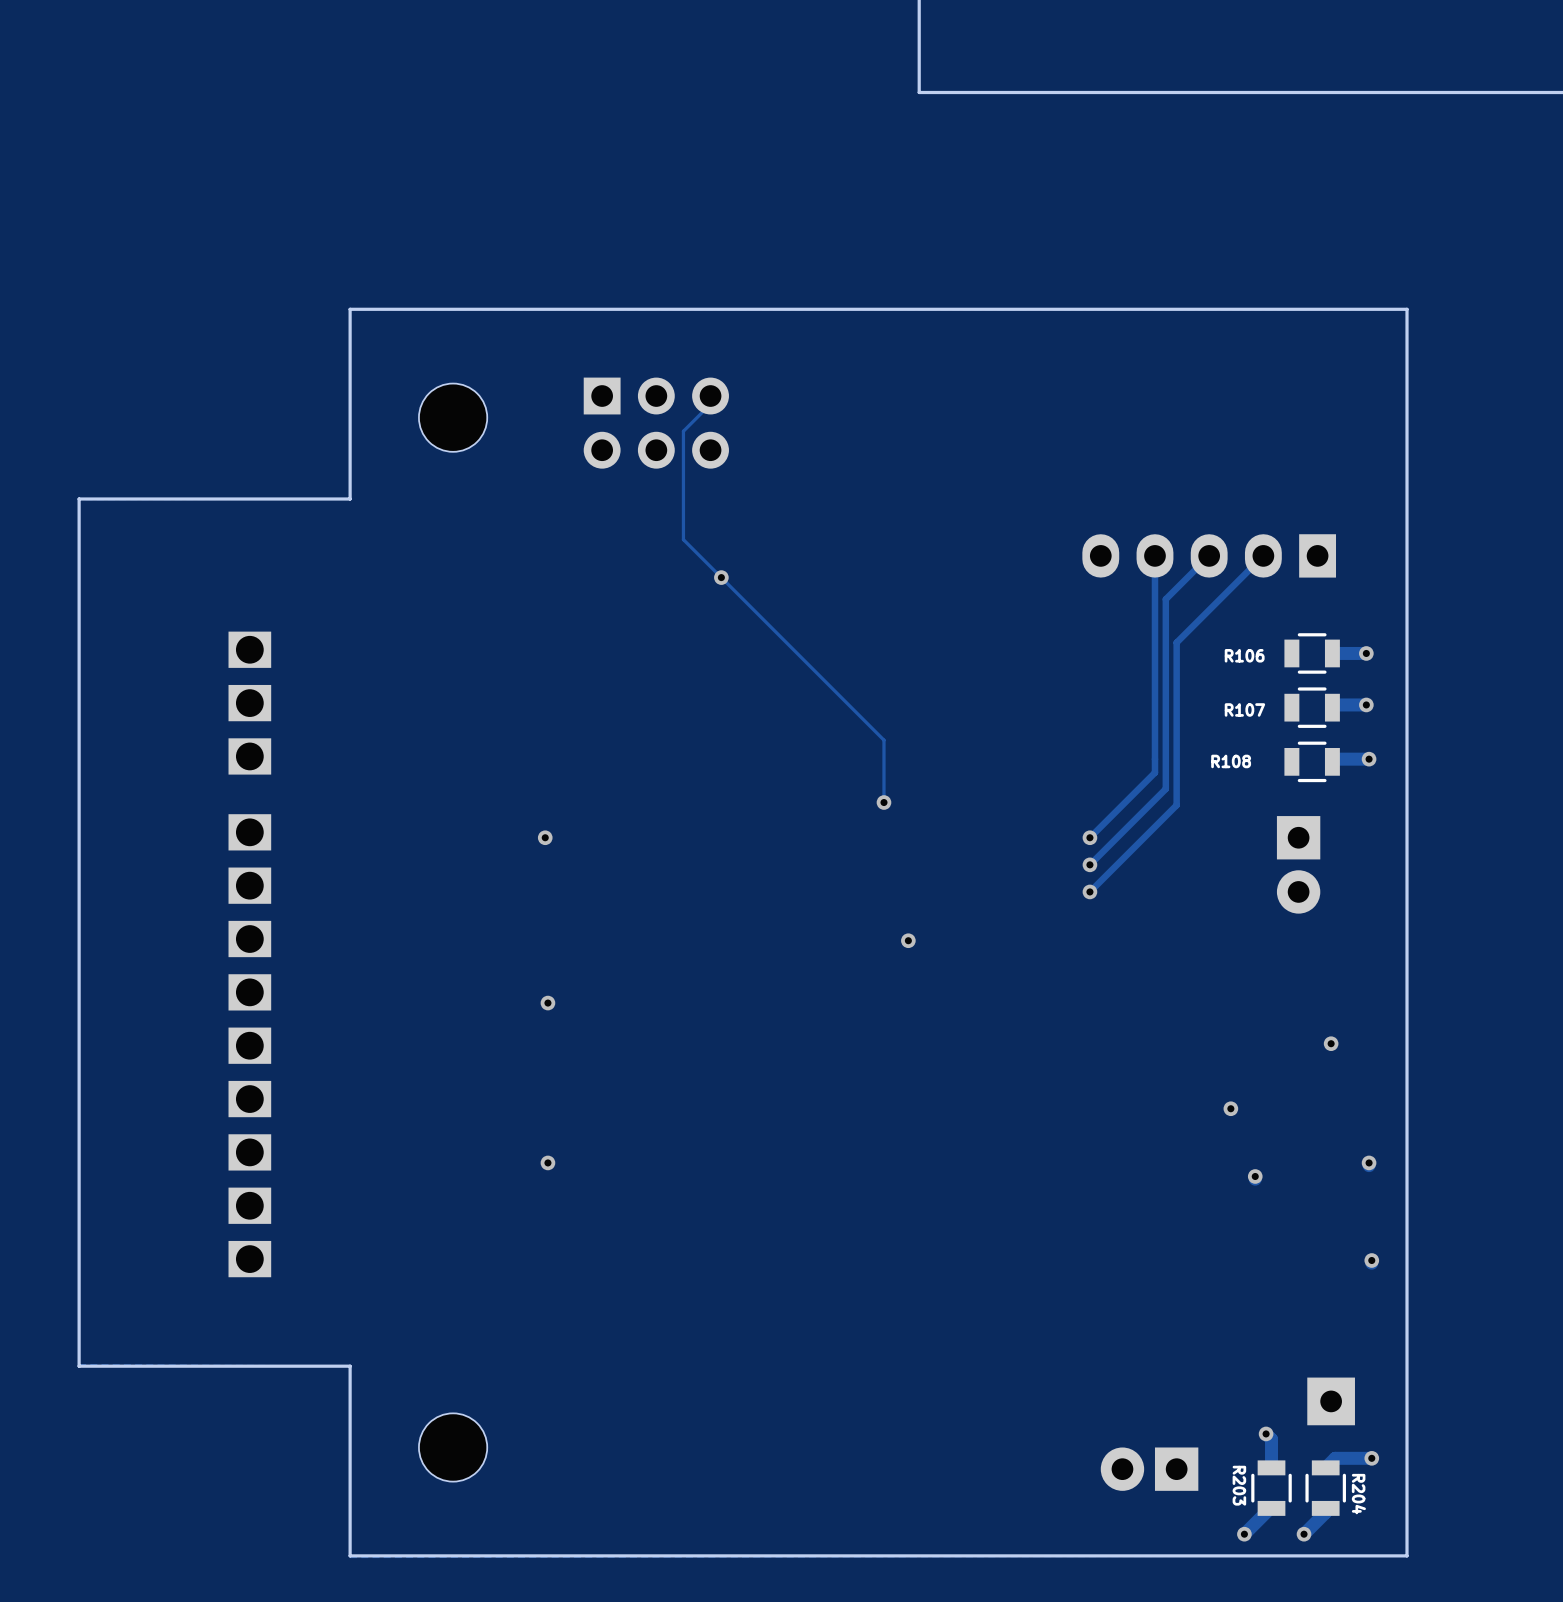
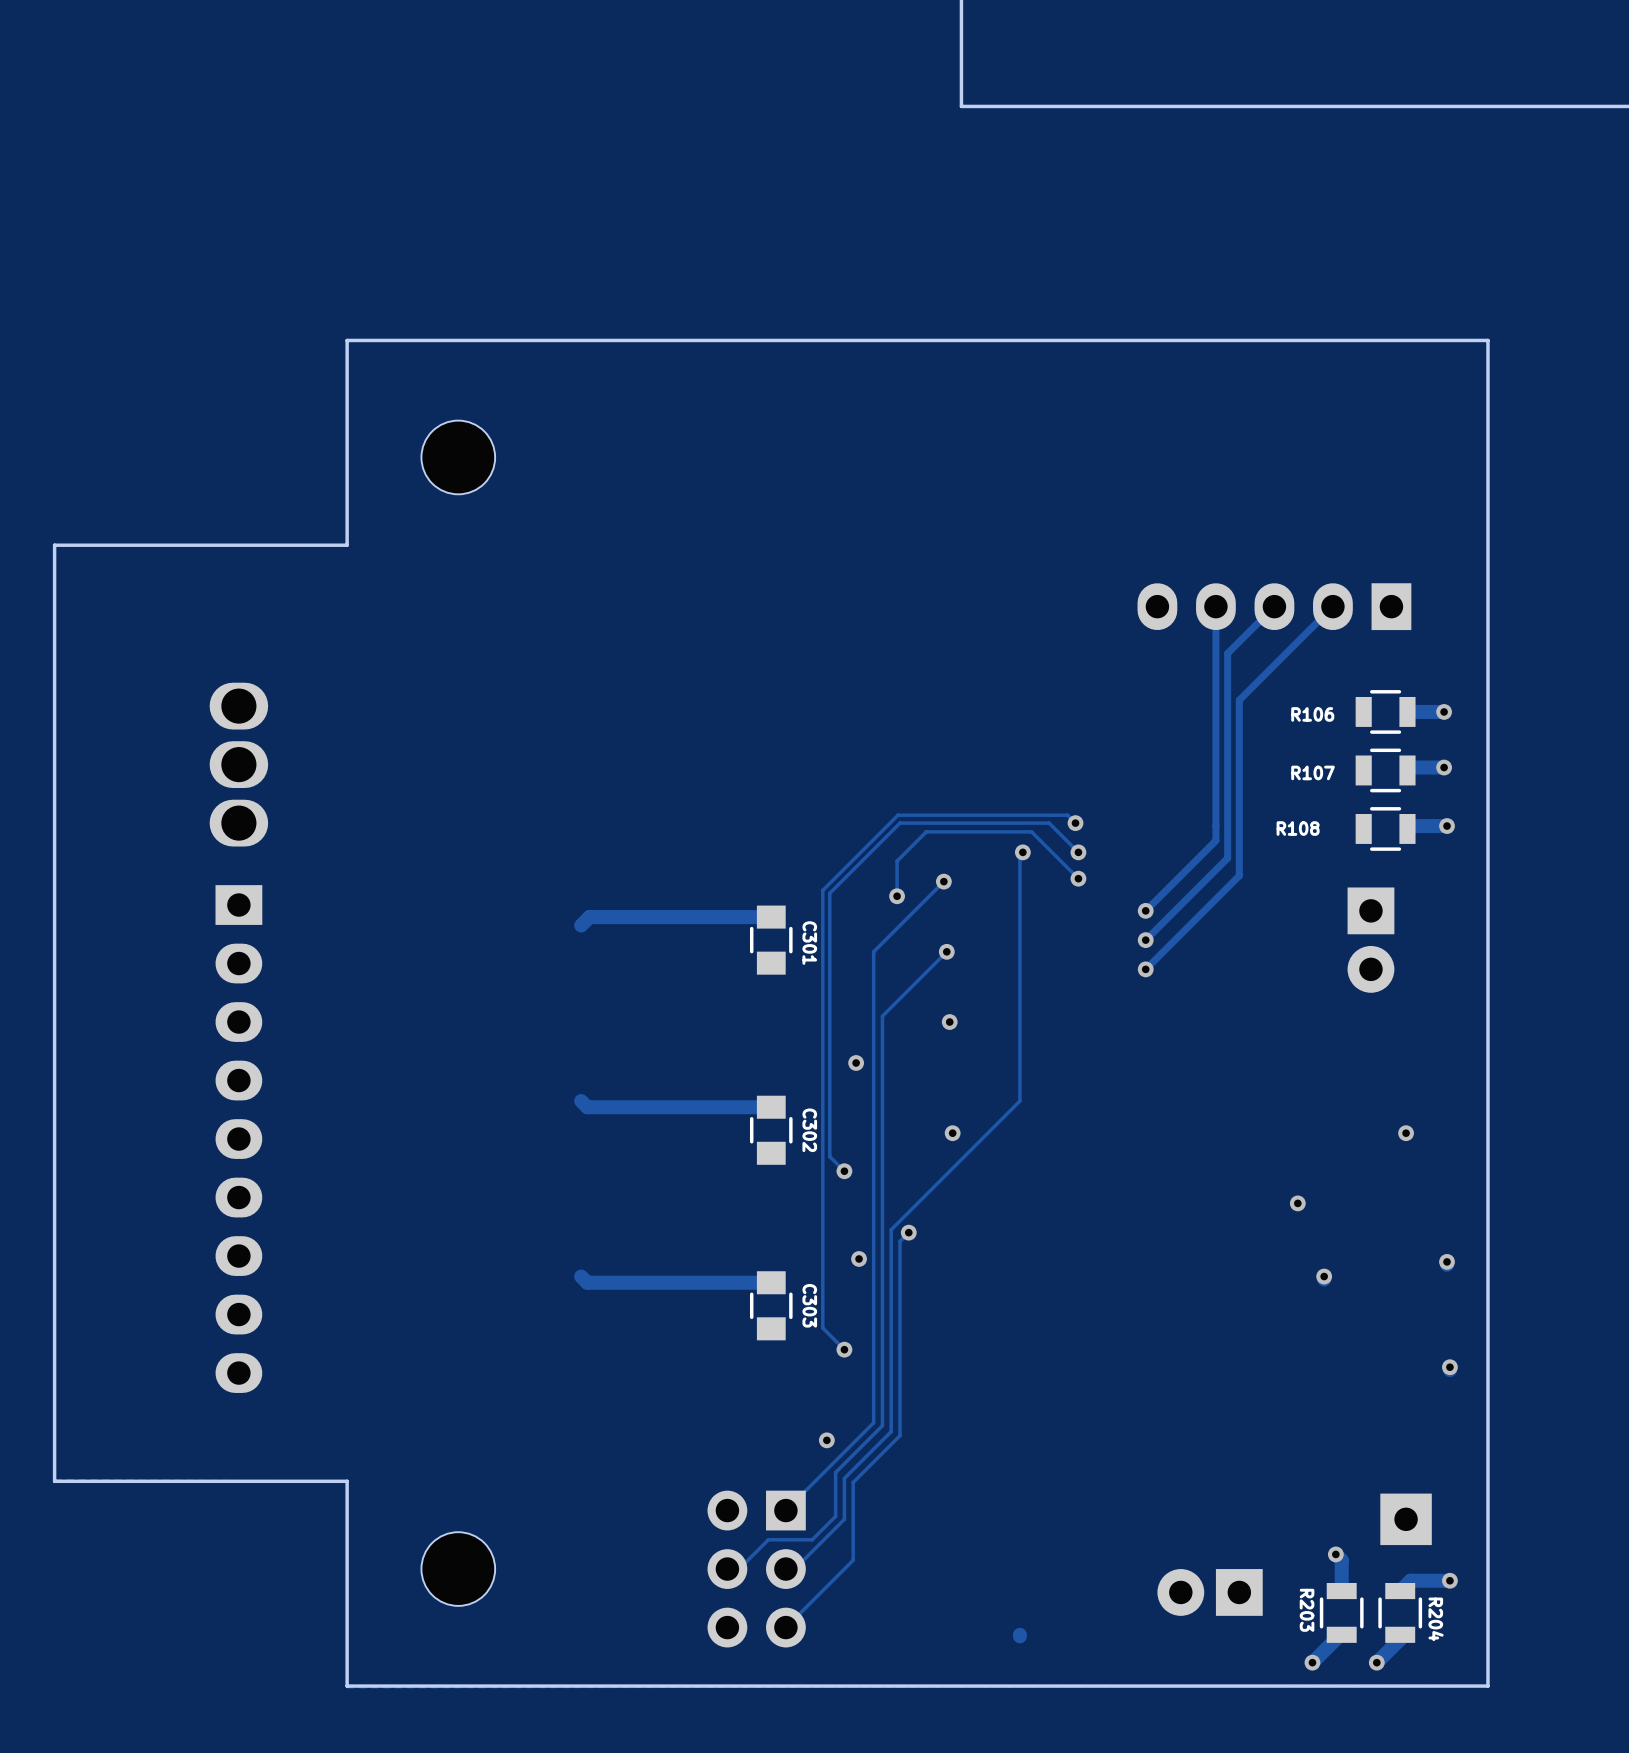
track: (710, 396) (710, 404) (683, 431) (683, 539) (883, 740) (883, 802) -> none
part: (656, 423) -> none
via: (721, 577) -> none
part footprint: [228, 631, 272, 775] -> [209, 682, 269, 847]
track: none -> (1075, 823) (1067, 815) (897, 815) (822, 890) (822, 1328) (844, 1349)
via: none -> (1075, 823)
track: none -> (1022, 852) (1019, 855) (1019, 1101) (891, 1229) (891, 1431) (844, 1478) (844, 1519) (794, 1569) (785, 1569)
via: none -> (1022, 852)
track: none -> (1078, 852) (1049, 823) (900, 823) (829, 893) (829, 1156) (844, 1171)
via: none -> (1078, 852)
via: (883, 802) -> none
track: none -> (1078, 878) (1031, 831) (926, 831) (897, 861) (897, 896)
via: none -> (1078, 878)
track: none -> (943, 881) (873, 951) (873, 1422) (785, 1510)
via: none -> (943, 881)
part footprint: [228, 814, 272, 1278] -> [215, 885, 263, 1393]
via: none -> (897, 896)
via: (545, 837) -> none
track: none -> (771, 917) (589, 917) (581, 925)
C301: none -> (771, 940)
track: none -> (946, 951) (882, 1016) (882, 1425) (835, 1472) (835, 1516) (812, 1539) (768, 1539) (739, 1569) (727, 1569)
via: none -> (946, 951)
via: none -> (856, 1062)
via: (547, 1003) -> none
track: none -> (581, 1101) (587, 1107) (771, 1107)
C302: none -> (771, 1130)
via: none -> (952, 1133)
via: none -> (844, 1171)
track: none -> (908, 1232) (900, 1241) (900, 1435) (853, 1482) (853, 1560) (785, 1627) (785, 1618)
via: none -> (908, 1232)
via: none -> (859, 1258)
via: (547, 1162) -> none
track: none -> (581, 1276) (587, 1282) (771, 1282)
C303: none -> (771, 1305)
via: none -> (844, 1349)
via: none -> (826, 1440)
part: none -> (756, 1569)
track: none -> (1019, 1634) (1019, 1636)

